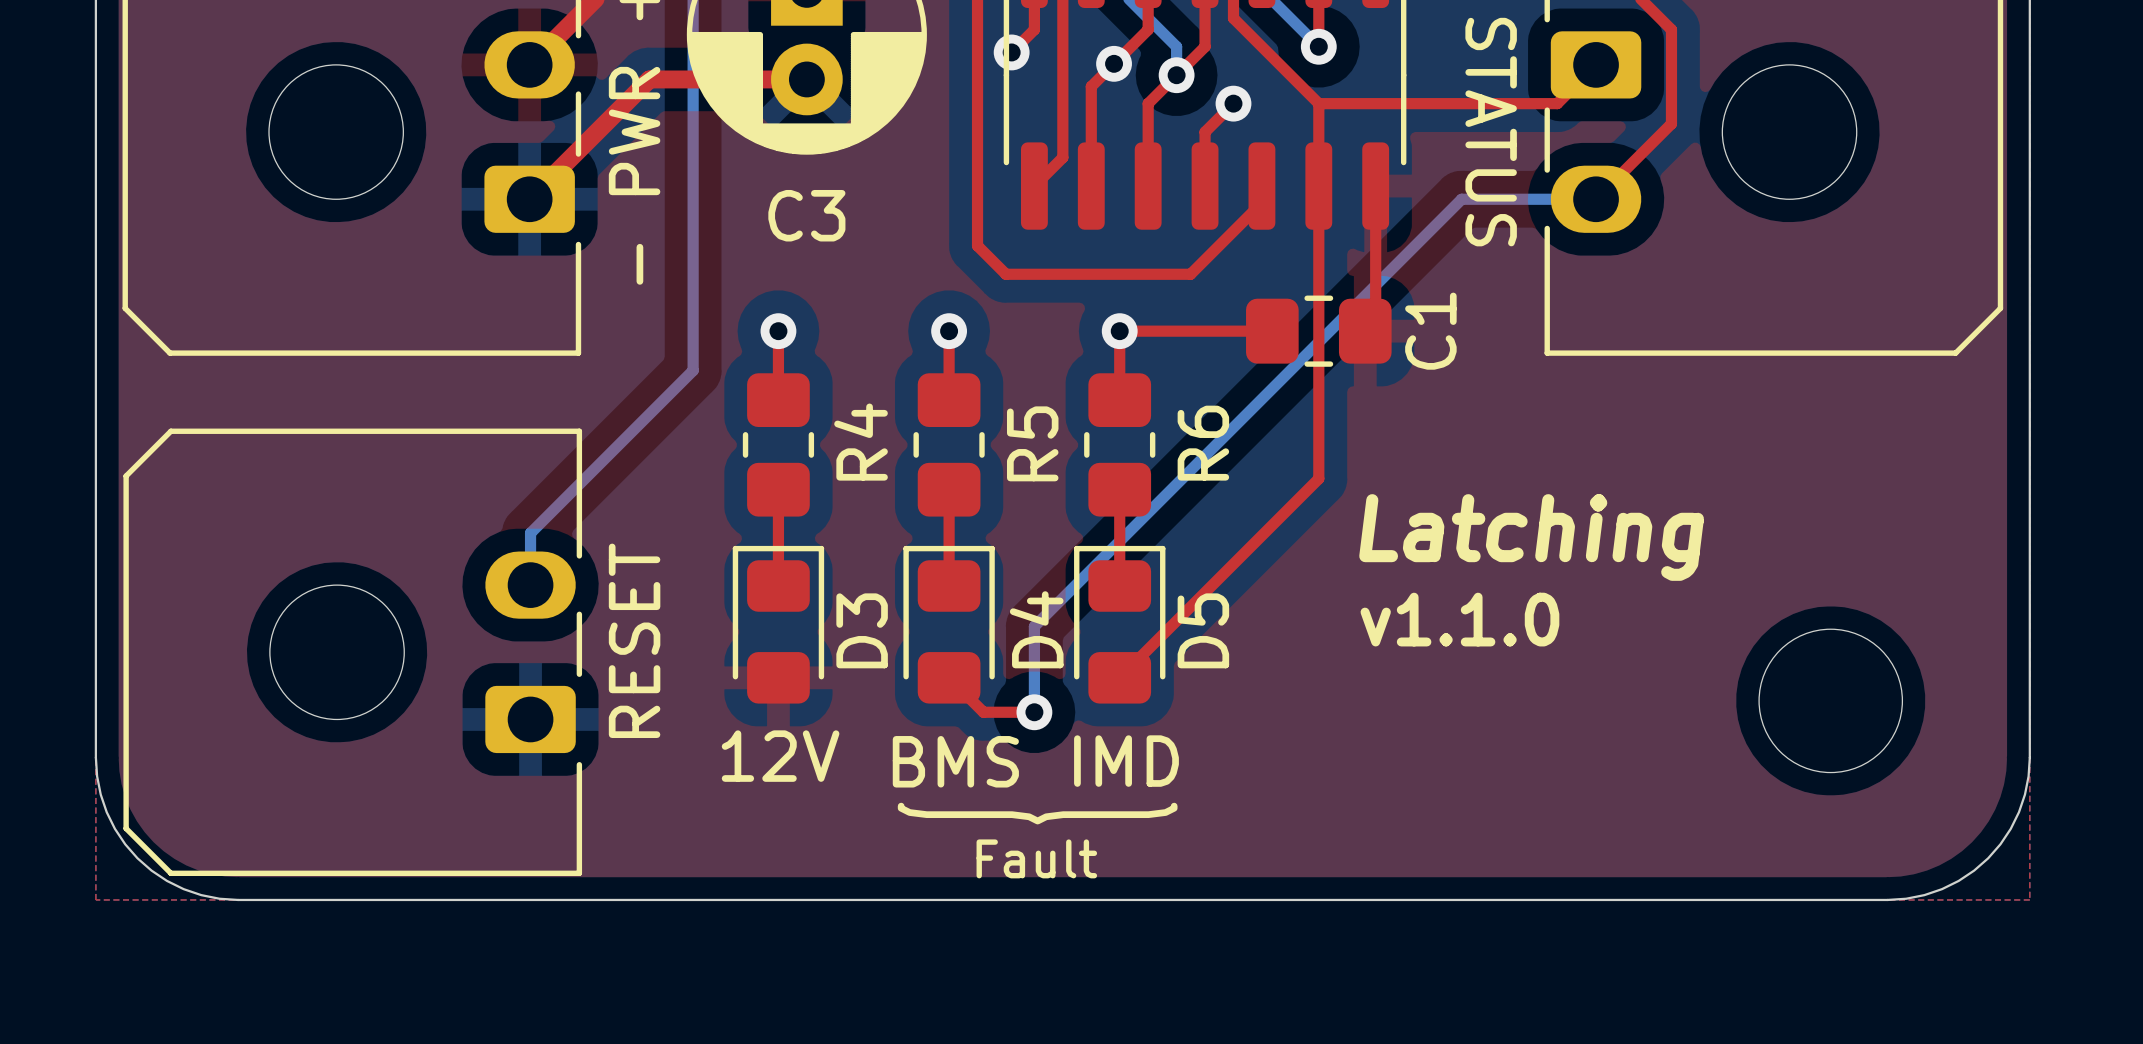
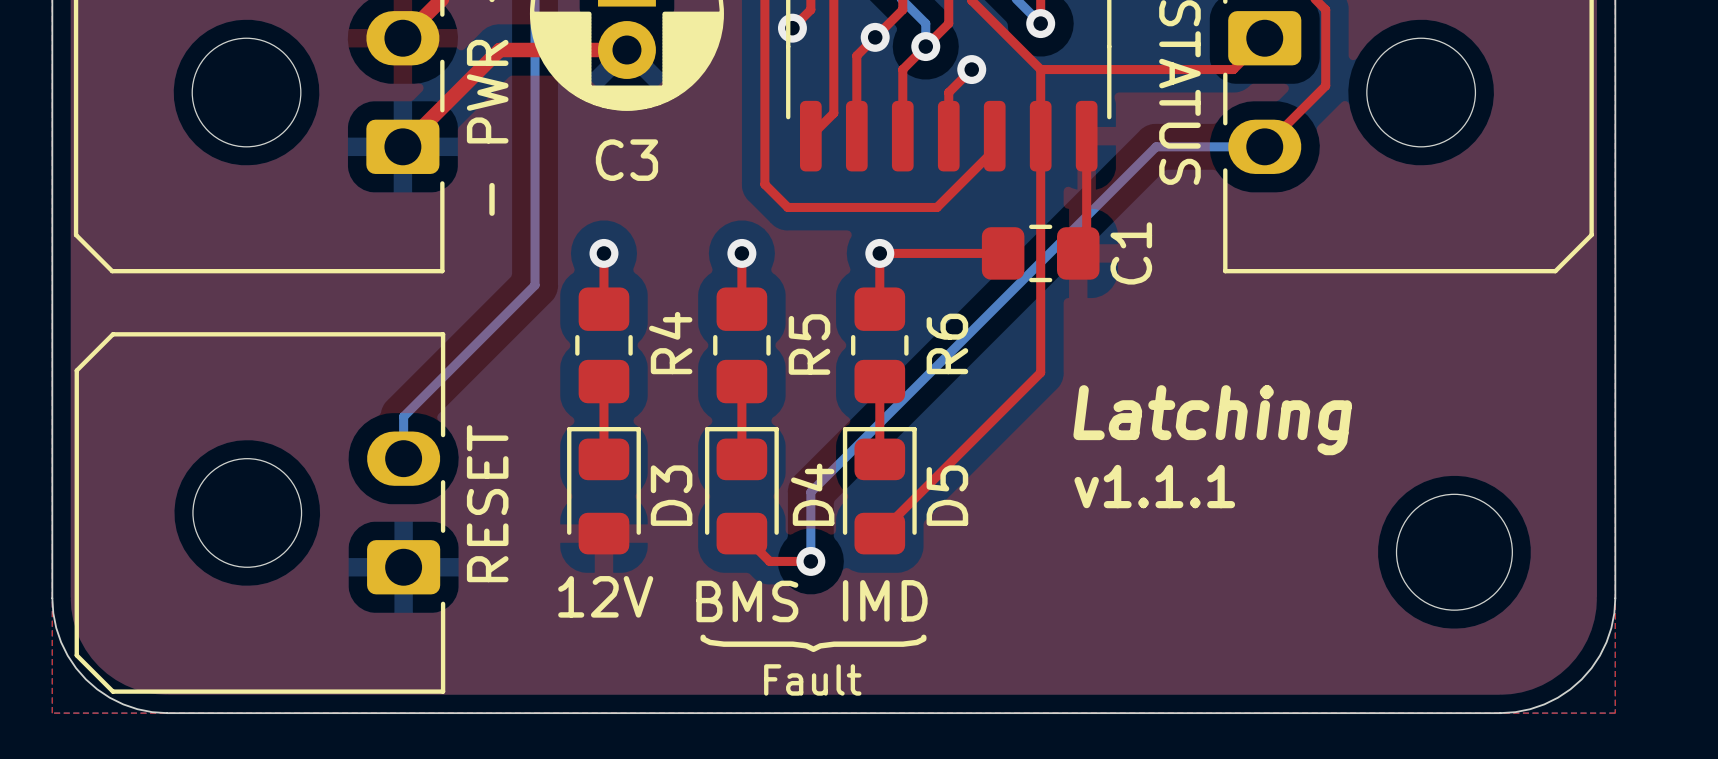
text: v1.1.0 (1459, 619) -> v1.1.1 (1154, 486)

